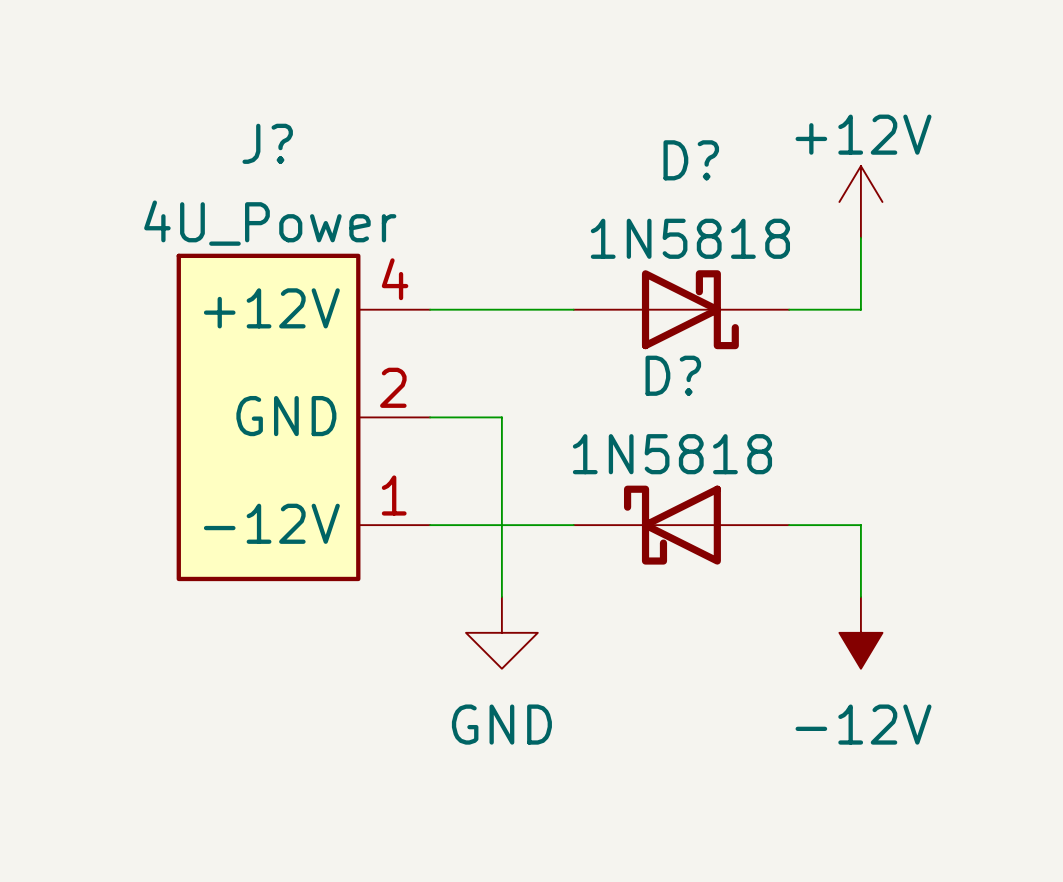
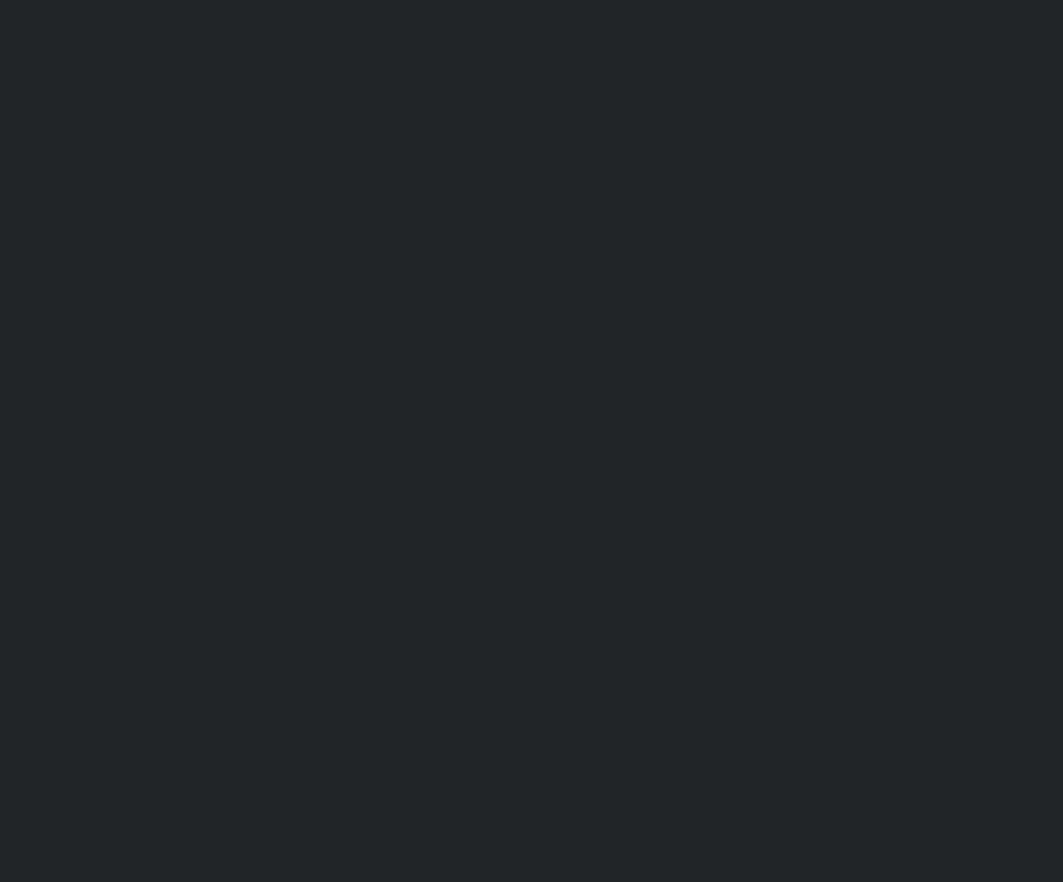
power symbol: +12V (860, 201) -> none
wire: (860, 237) (860, 309) (789, 309) -> none
wire: (430, 309) (573, 309) -> none
D?: 1N5818 (681, 309) -> none
J?: 4U_Power (303, 417) -> none
wire: (430, 417) (501, 417) (501, 596) -> none
wire: (430, 525) (573, 525) -> none
D?: 1N5818 (681, 525) -> none
wire: (789, 525) (860, 525) (860, 596) -> none
power symbol: GND (501, 632) -> none
power symbol: -12V (860, 632) -> none

